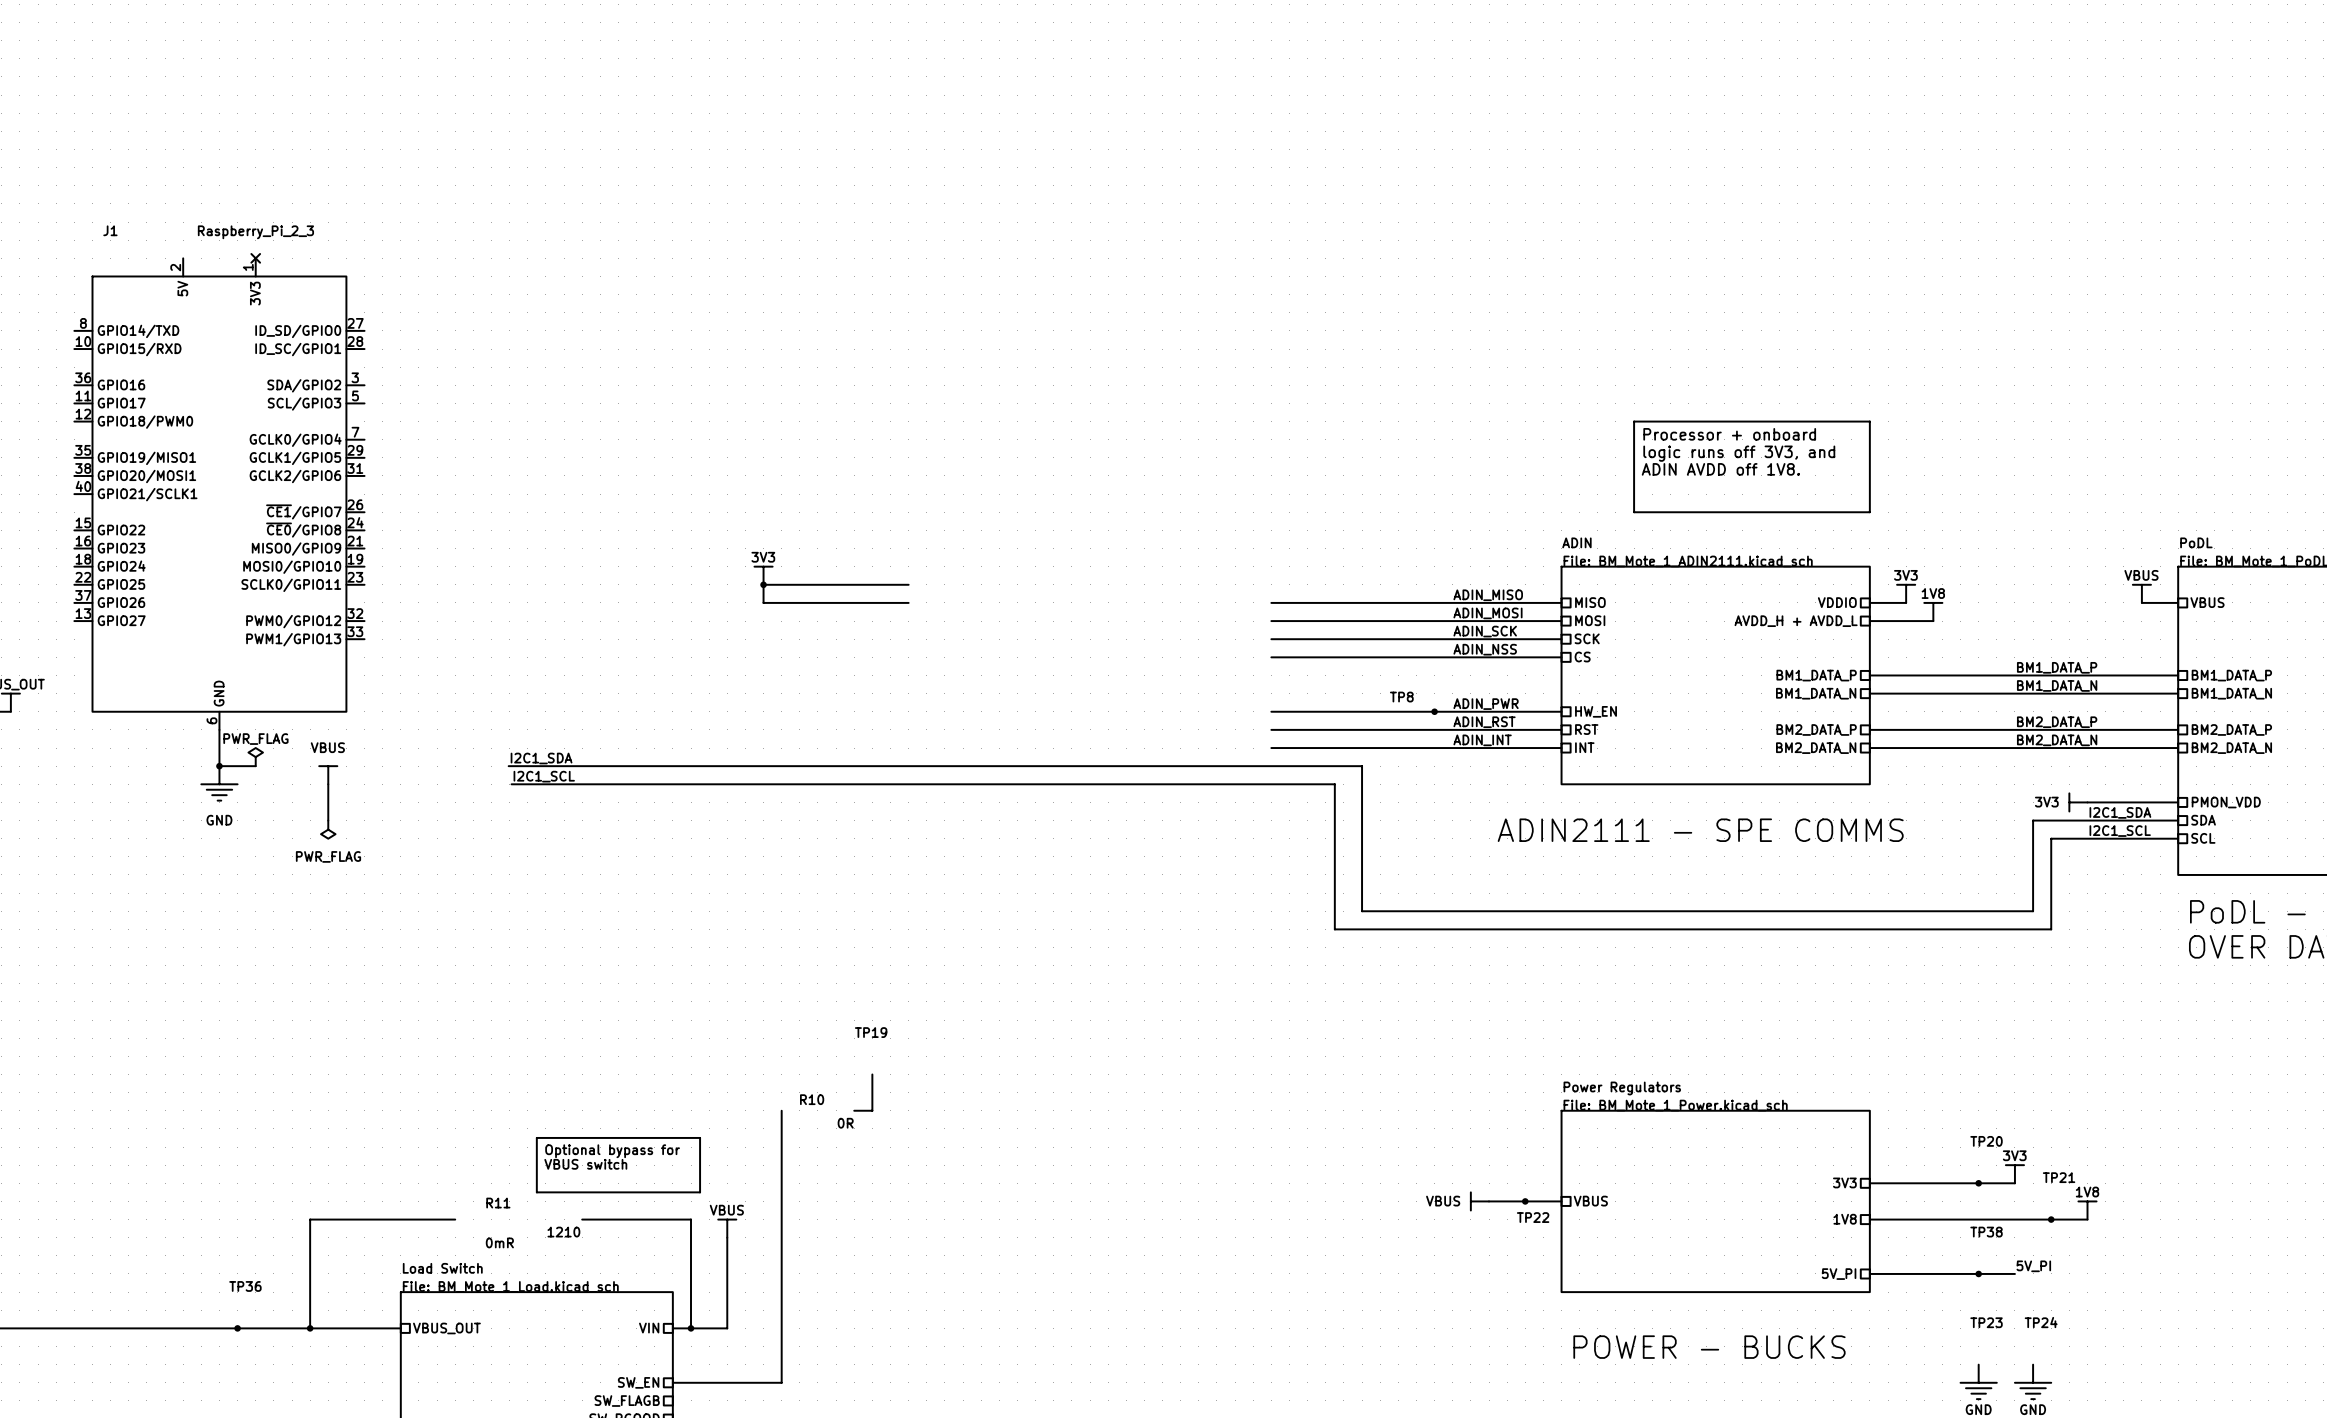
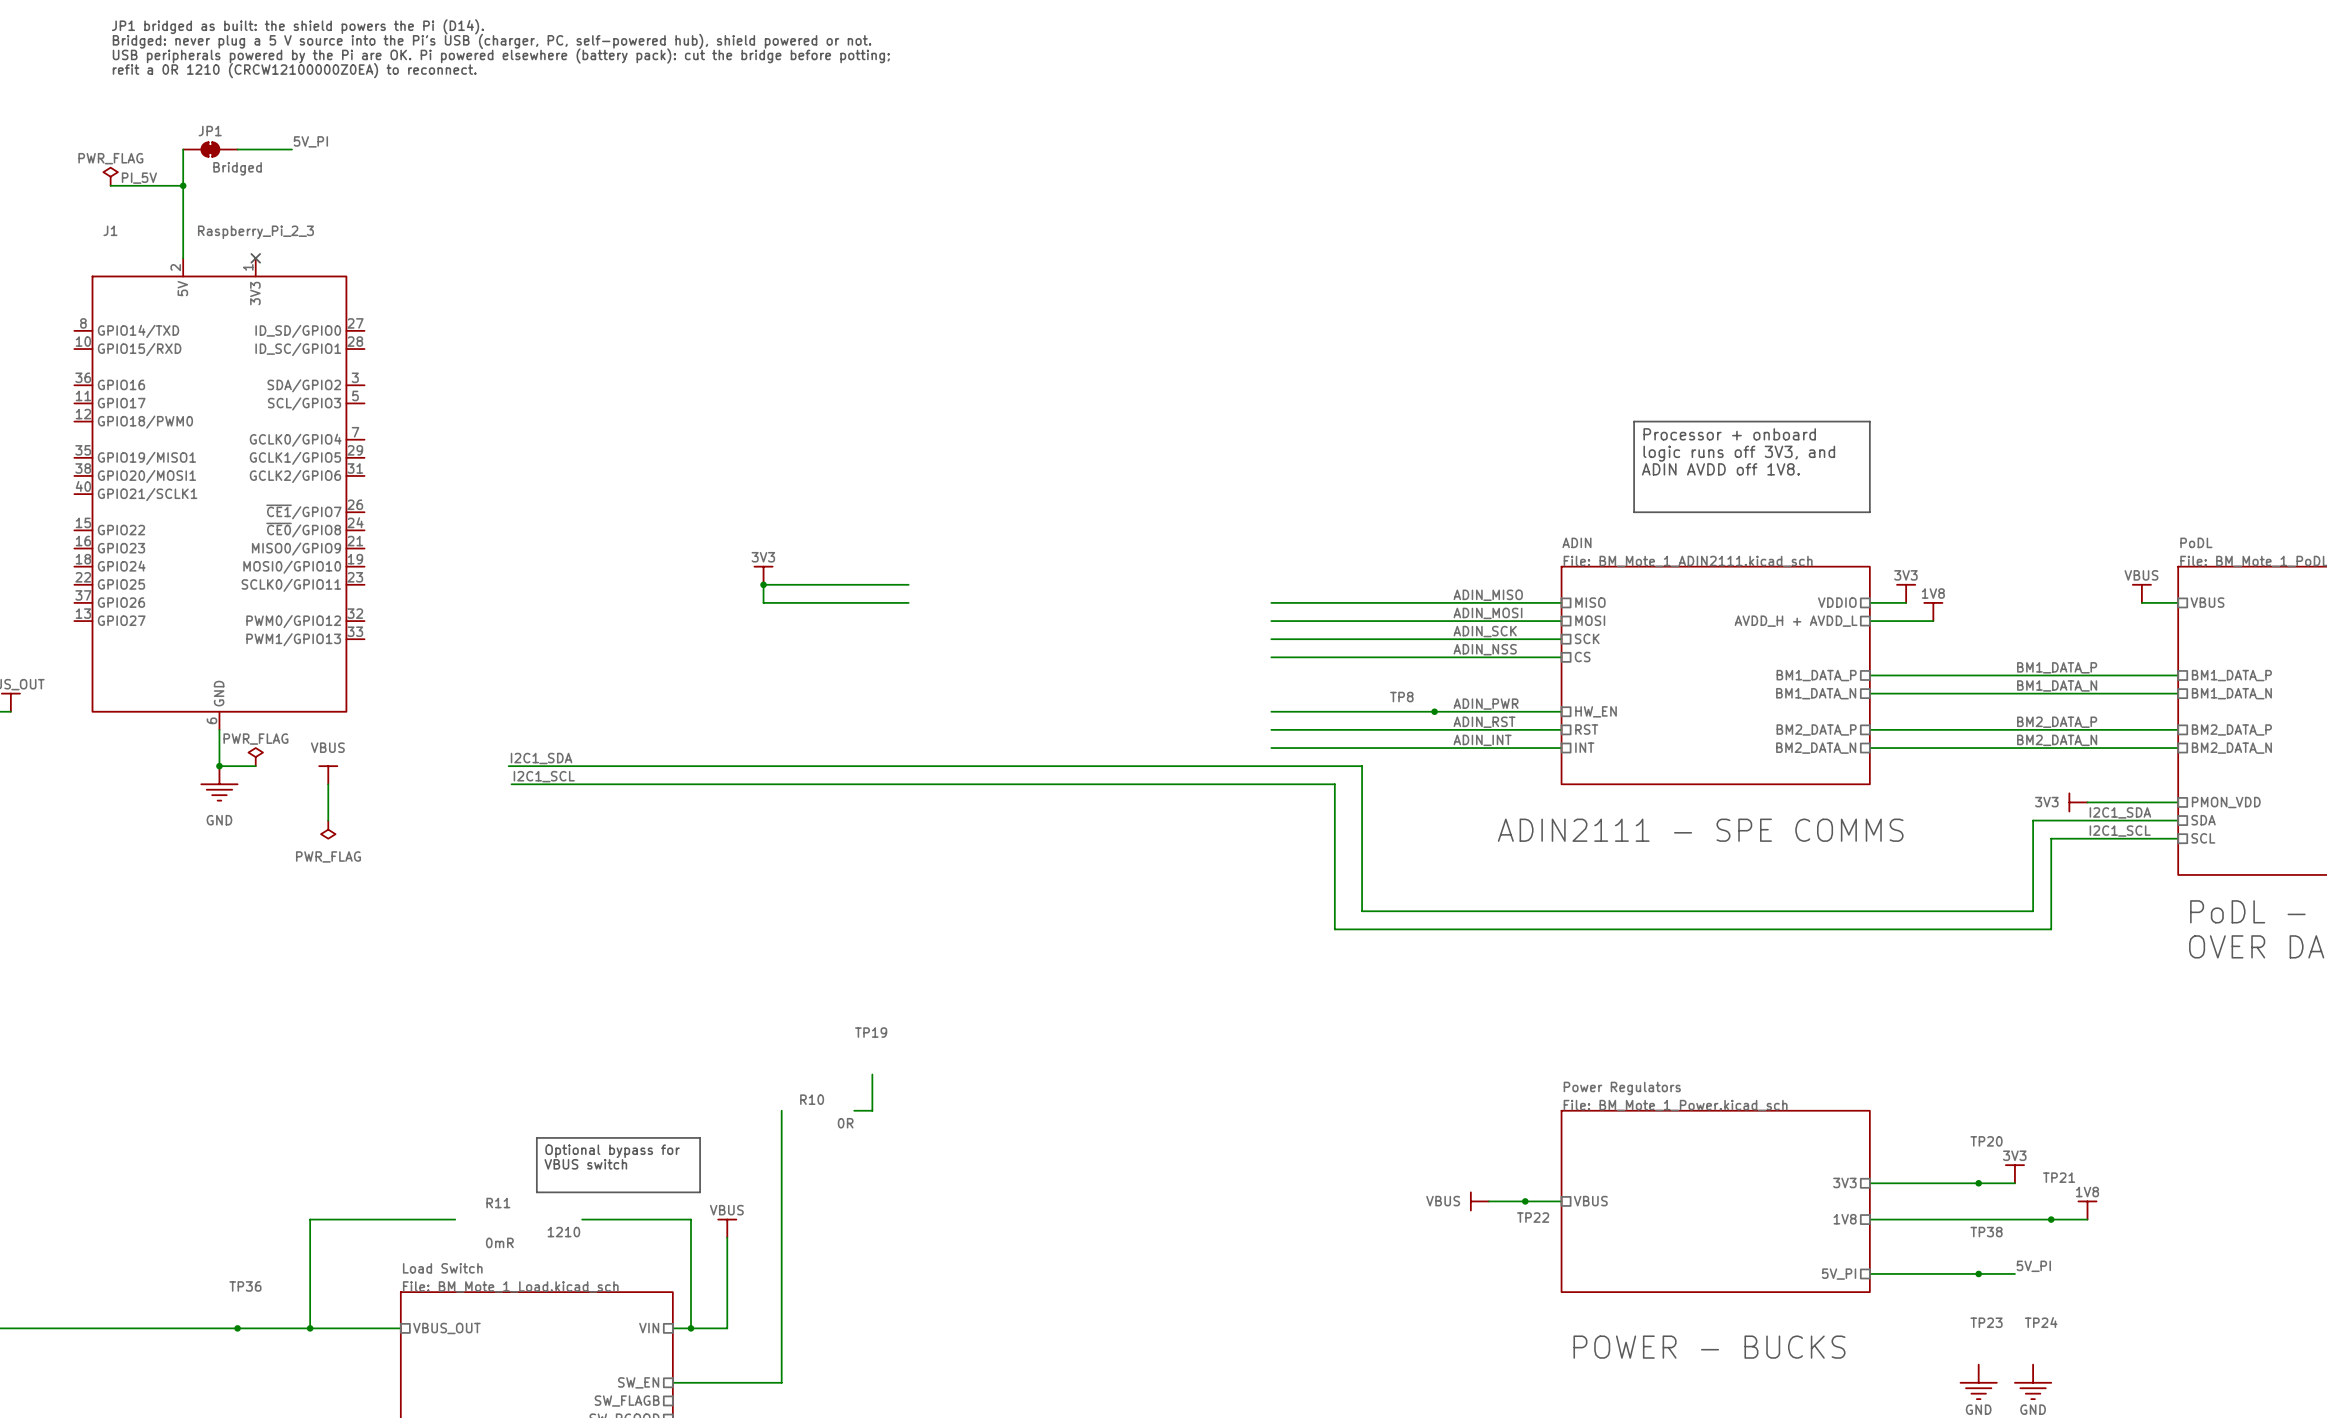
text: none -> JP1 bridged as built: the shield powers the Pi (D14). (297, 26)
text: none -> Bridged: never plug a 5 V source into the Pi's USB (charger, PC, self-powered hub), shield powered or not. (492, 41)
text: none -> USB peripherals powered by the Pi are OK. Pi powered elsewhere (battery pack): cut the bridge before potting; (501, 56)
text: none -> refit a 0R 1210 (CRCW12100000Z0EA) to reconnect. (294, 70)
label: none -> 5V_PI (310, 141)
wire: none -> (183, 149) (183, 258)
JP1: none -> Bridged (210, 149)
wire: none -> (237, 149) (292, 149)
power symbol: none -> PWR_FLAG (110, 176)
label: none -> PI_5V (139, 178)
wire: none -> (110, 185) (183, 185)
junction: none -> (183, 185)

